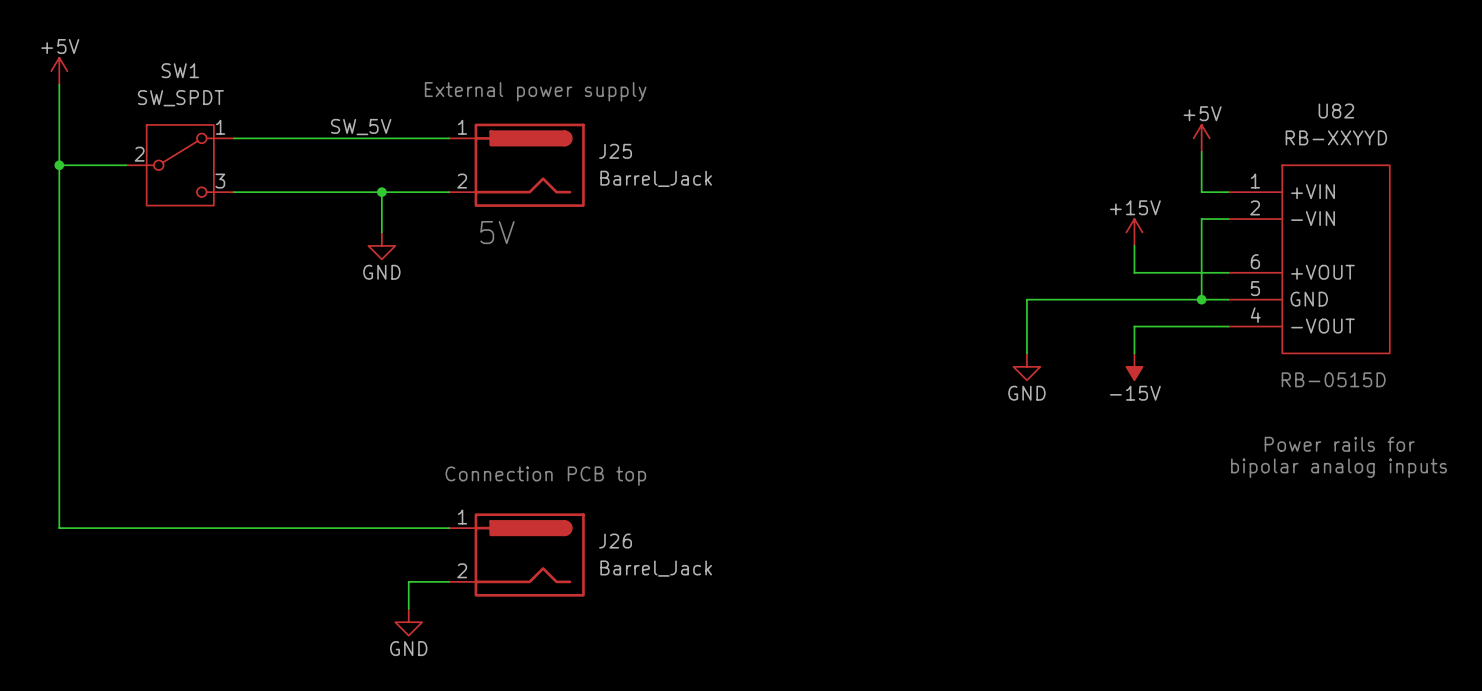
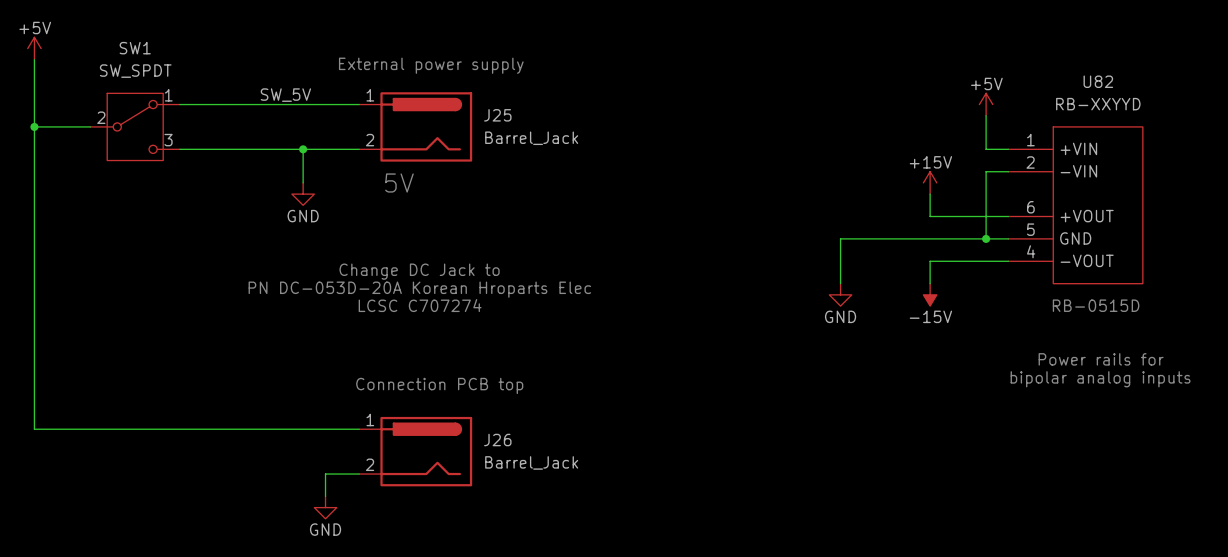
text: none -> Change DC Jack to (419, 271)
text: none -> PN DC-053D-20A Korean Hroparts Elec (419, 289)
text: none -> LCSC C707274 (420, 305)

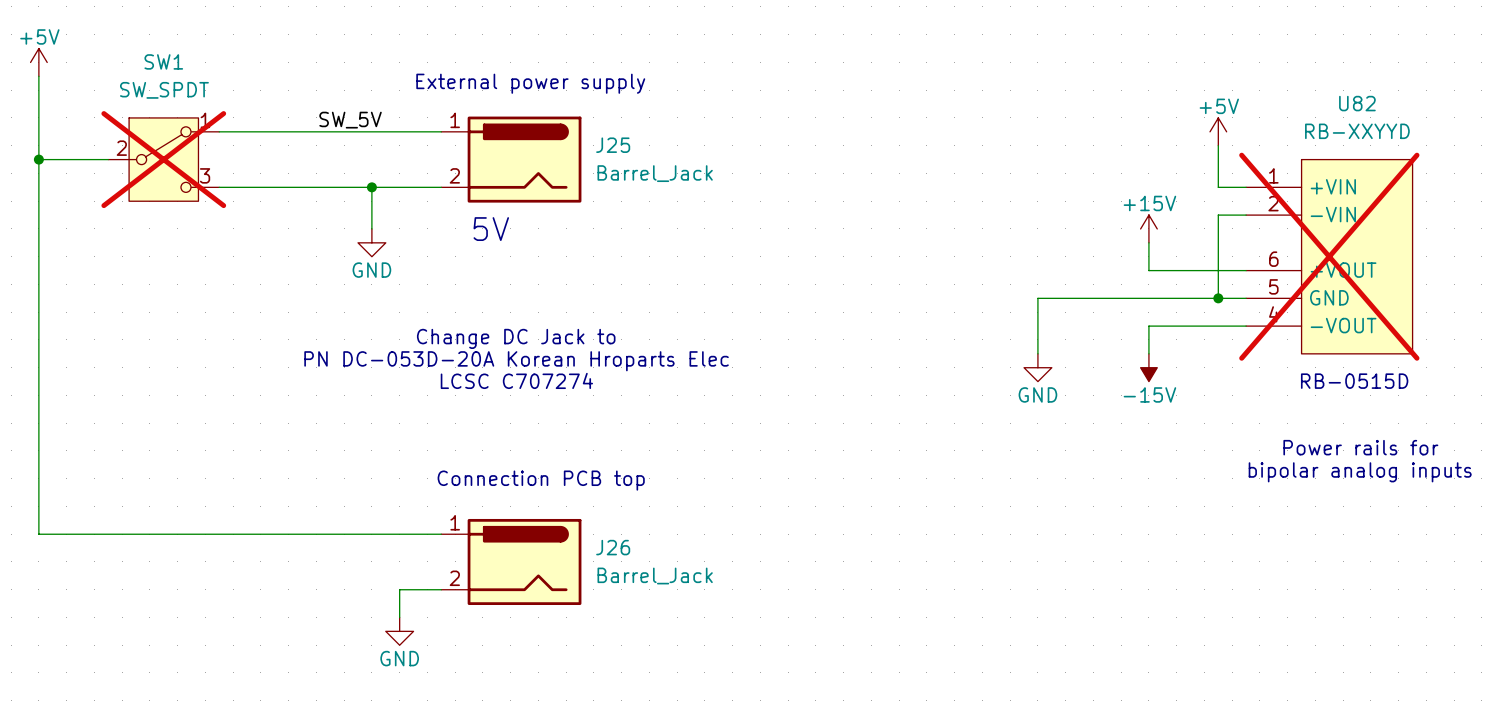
SW1 do-not-place cross: none -> (163, 159)
U82 do-not-place cross: none -> (1329, 256)

